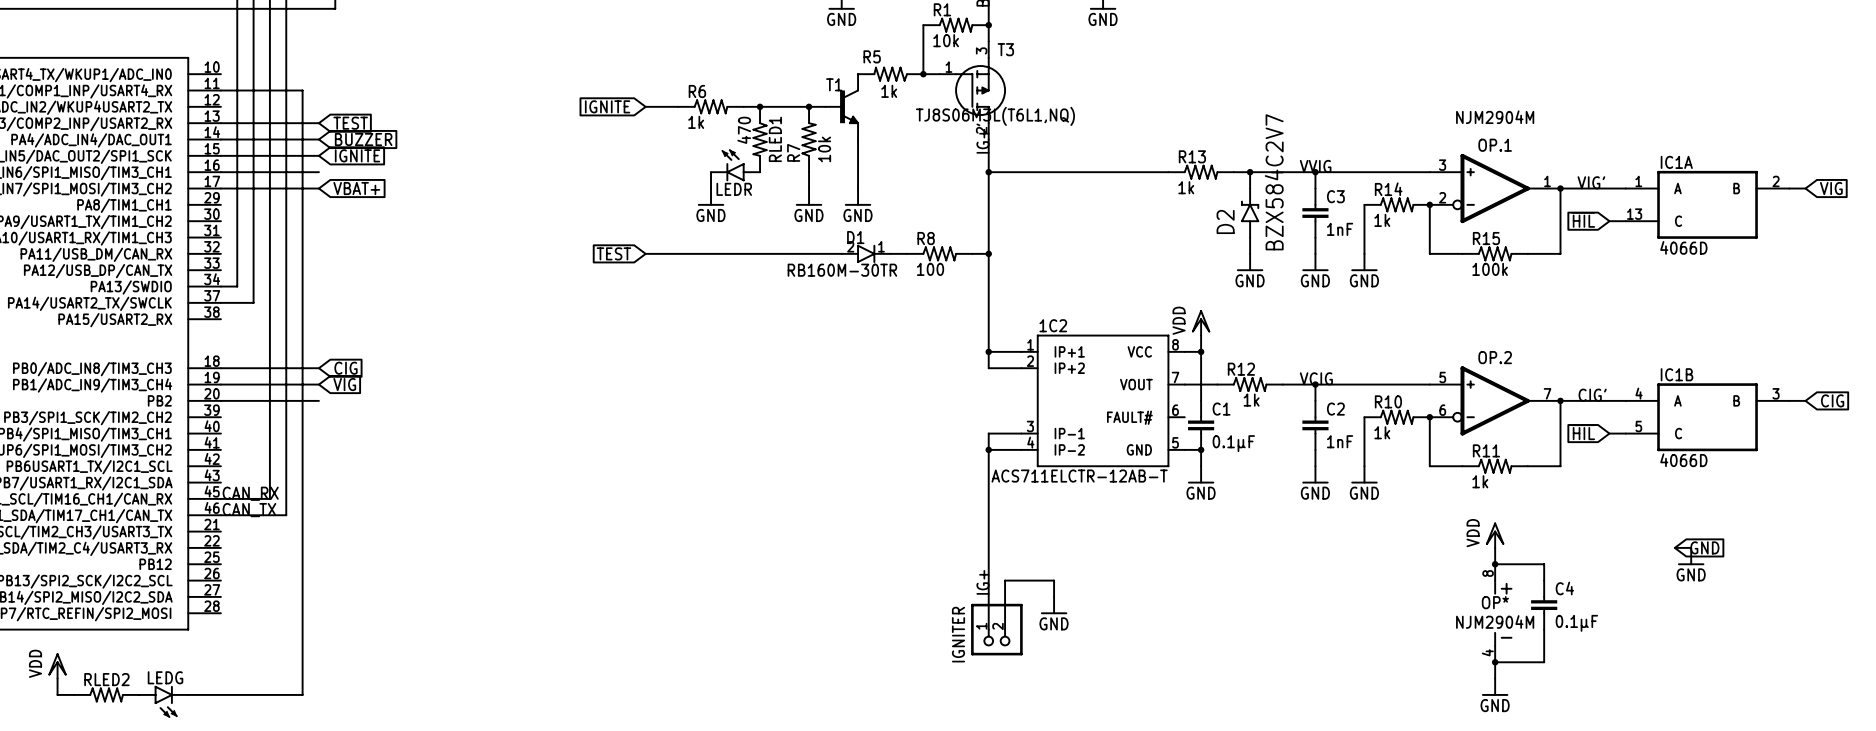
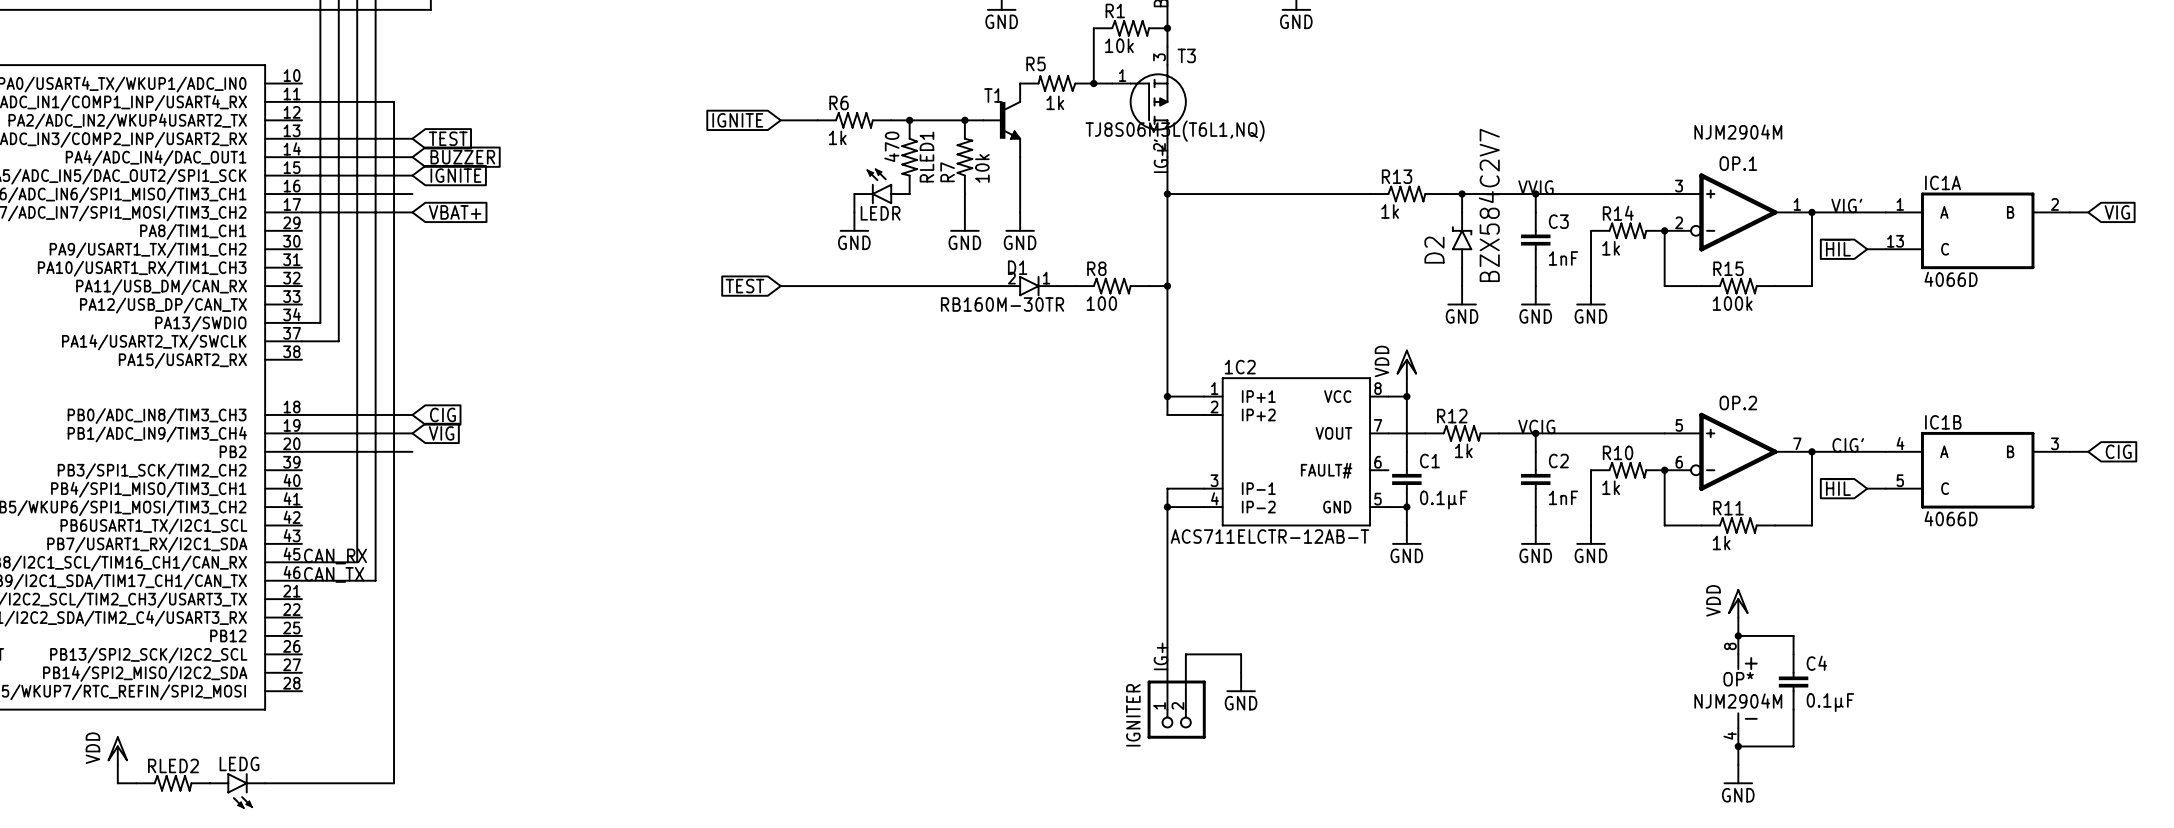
wire: (1674, 547) (1691, 547) -> none
global label: GND (1704, 547) -> none
power symbol: GND (1691, 556) -> none

